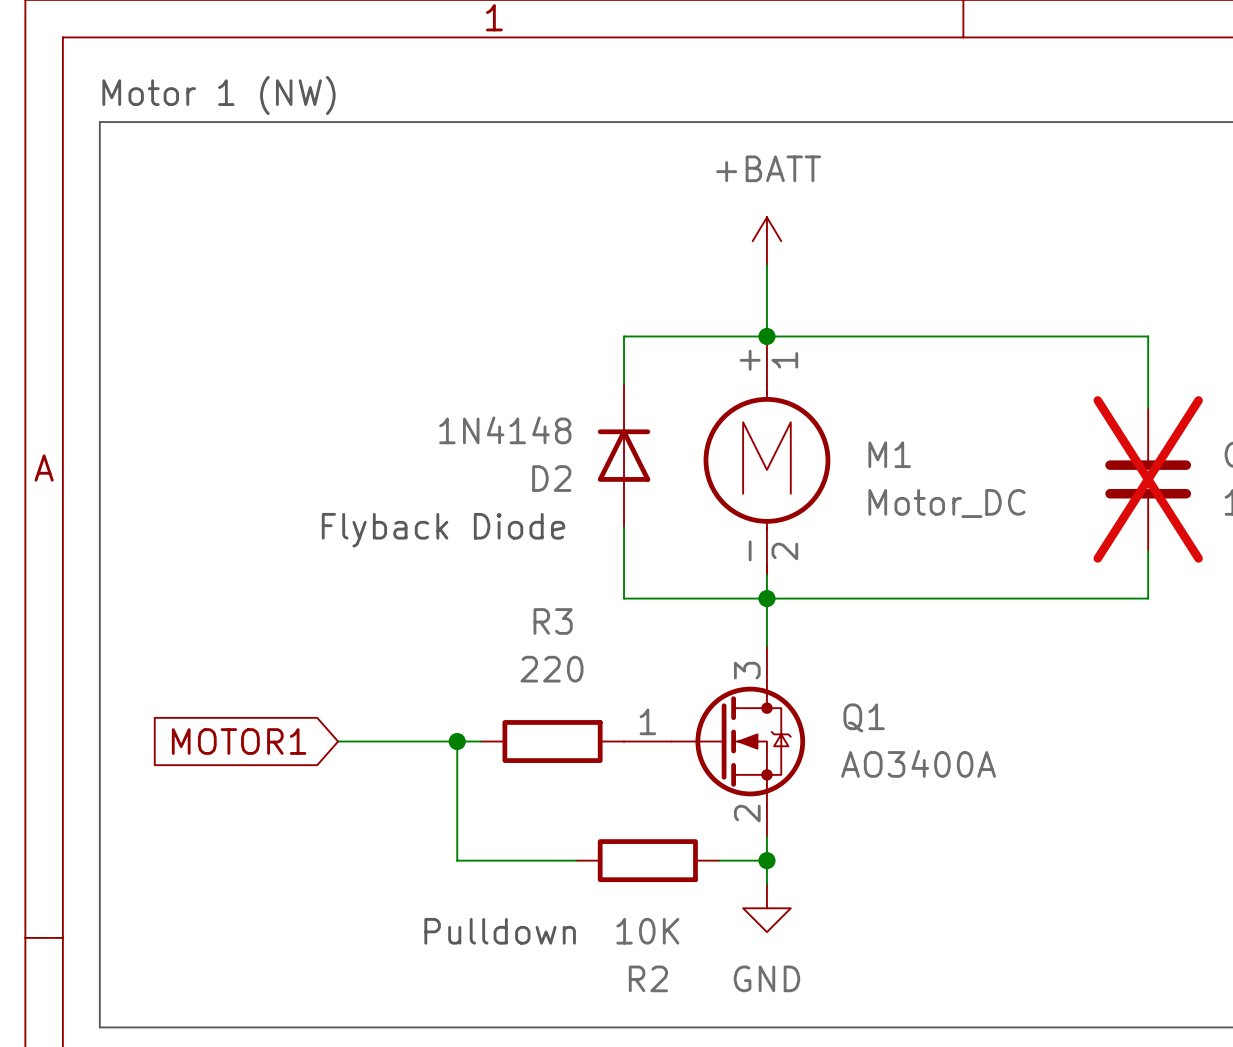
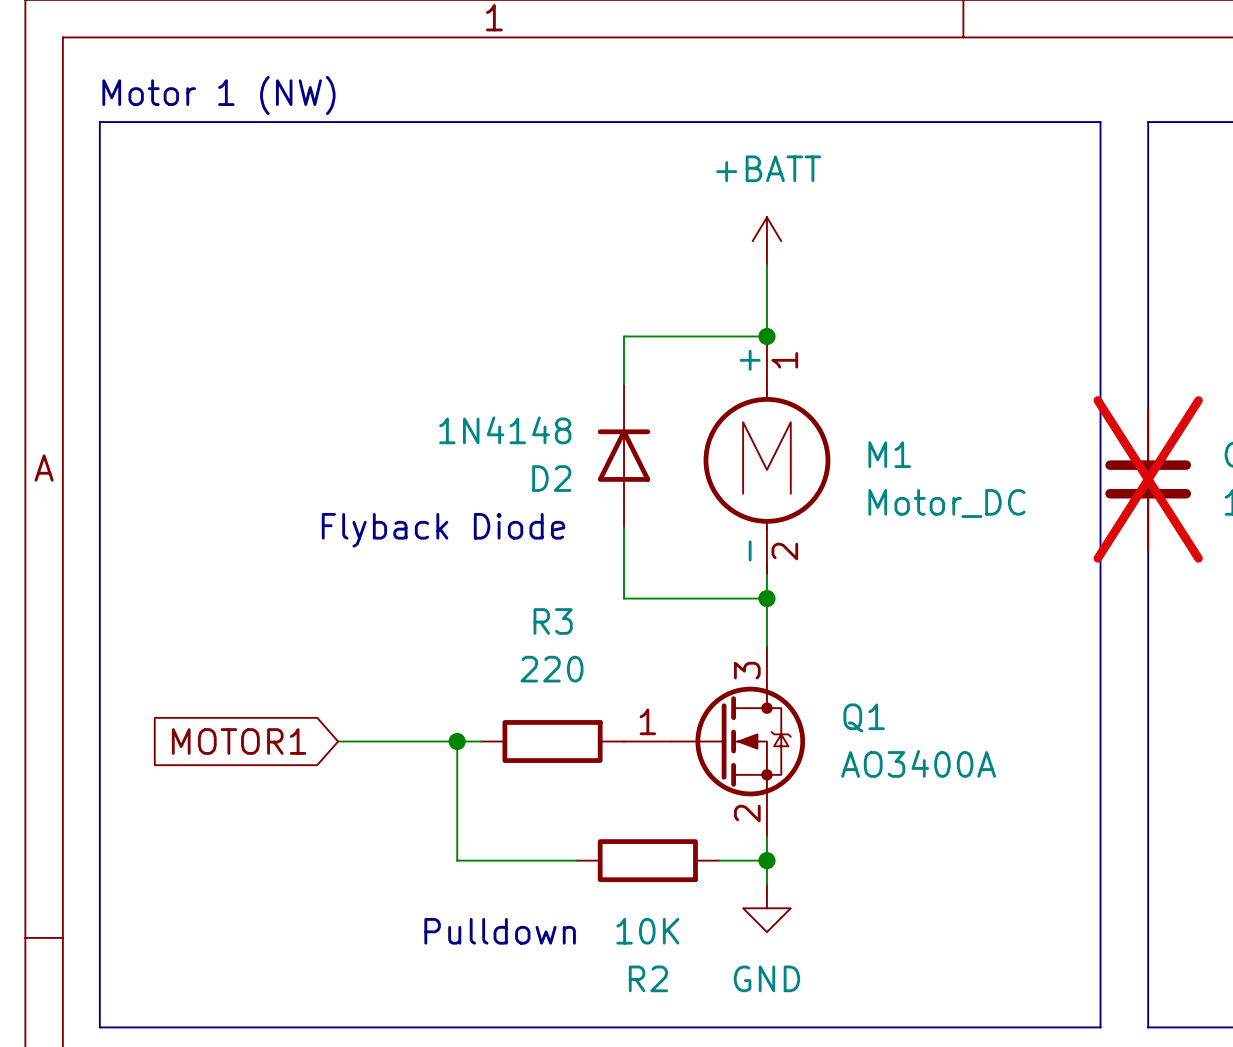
line: (1100, 122) (1148, 122) -> (1100, 122) (1100, 1027)
wire: (766, 336) (1148, 336) (1148, 407) -> none
wire: (1148, 550) (1148, 598) (766, 598) -> none
line: (1100, 1027) (1148, 1027) -> (1148, 122) (1148, 1027)

